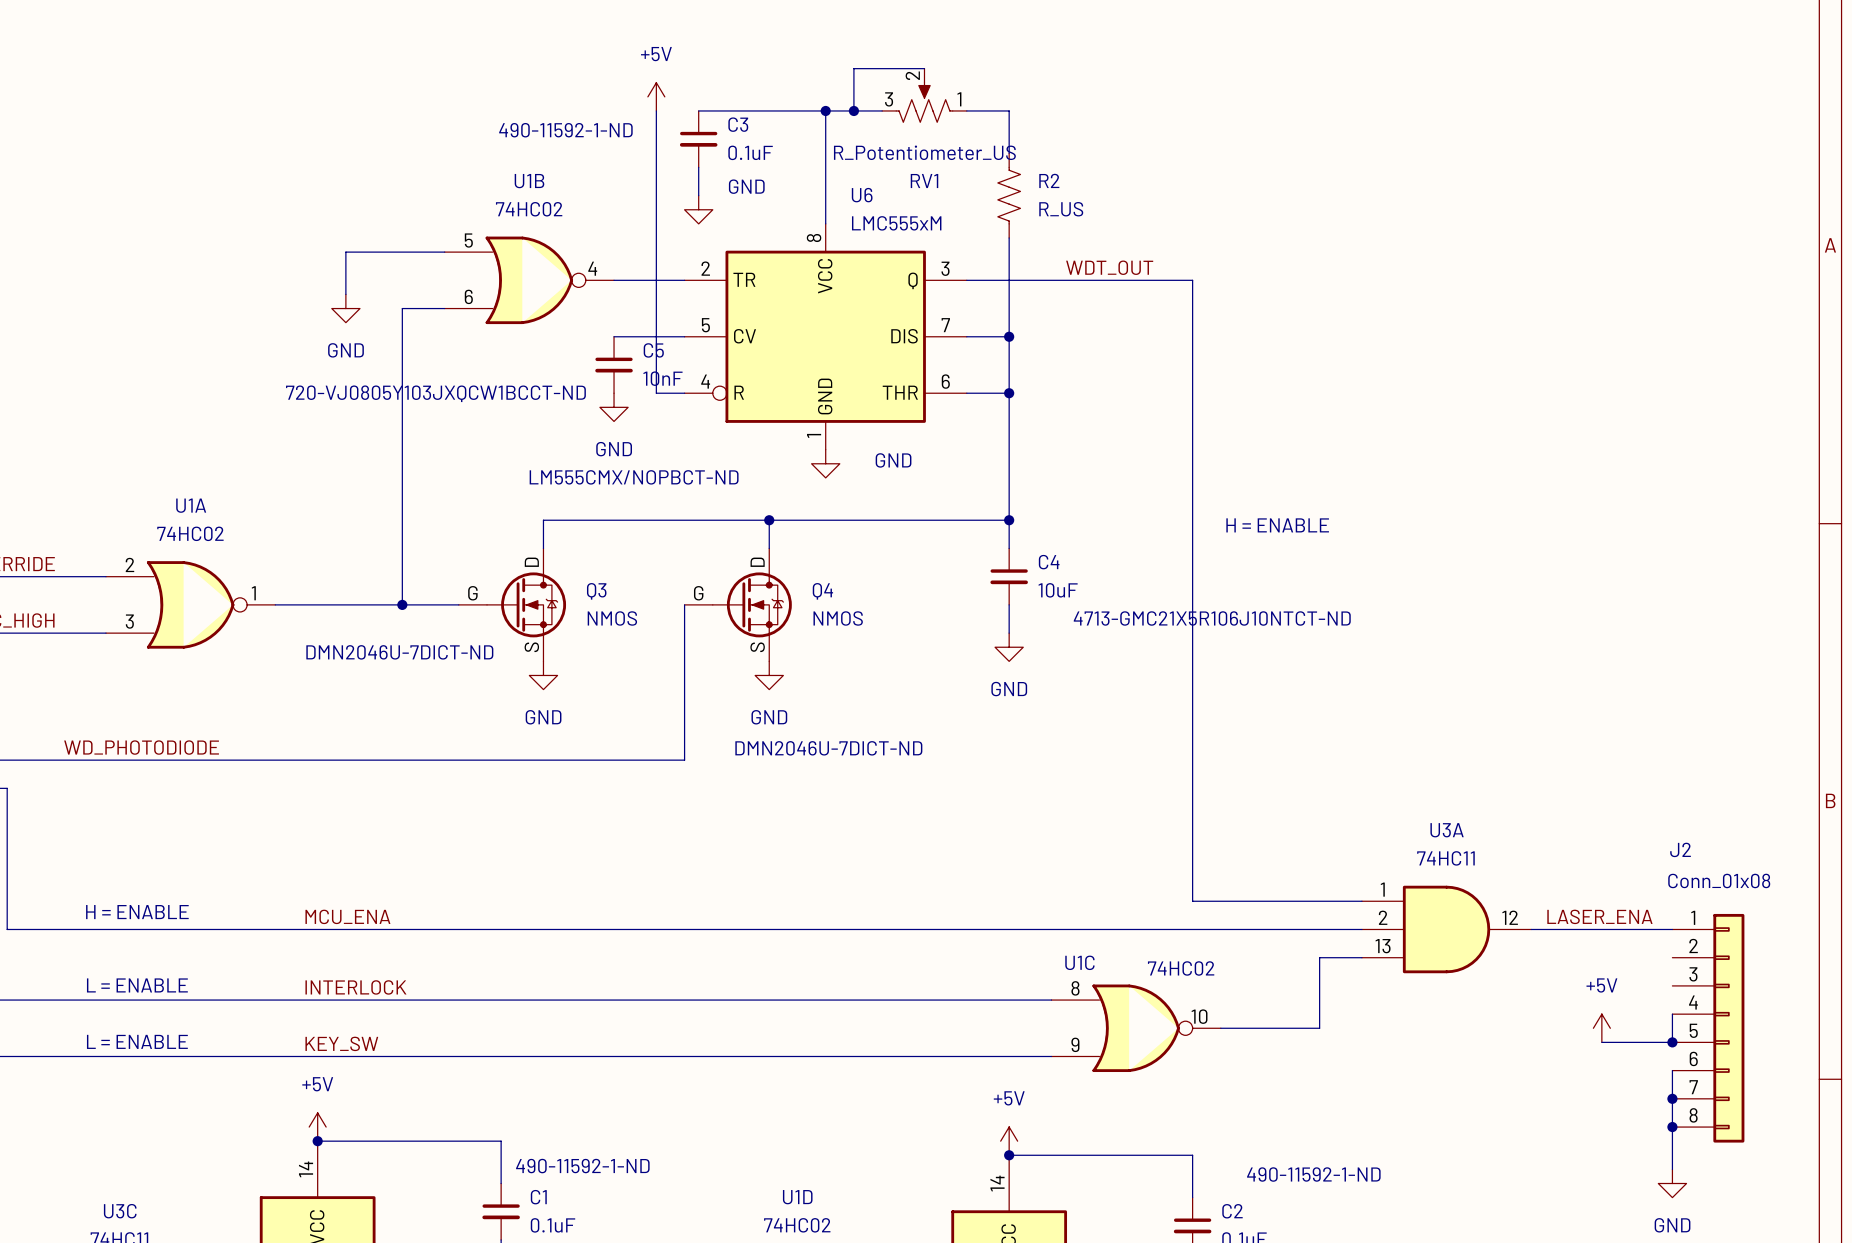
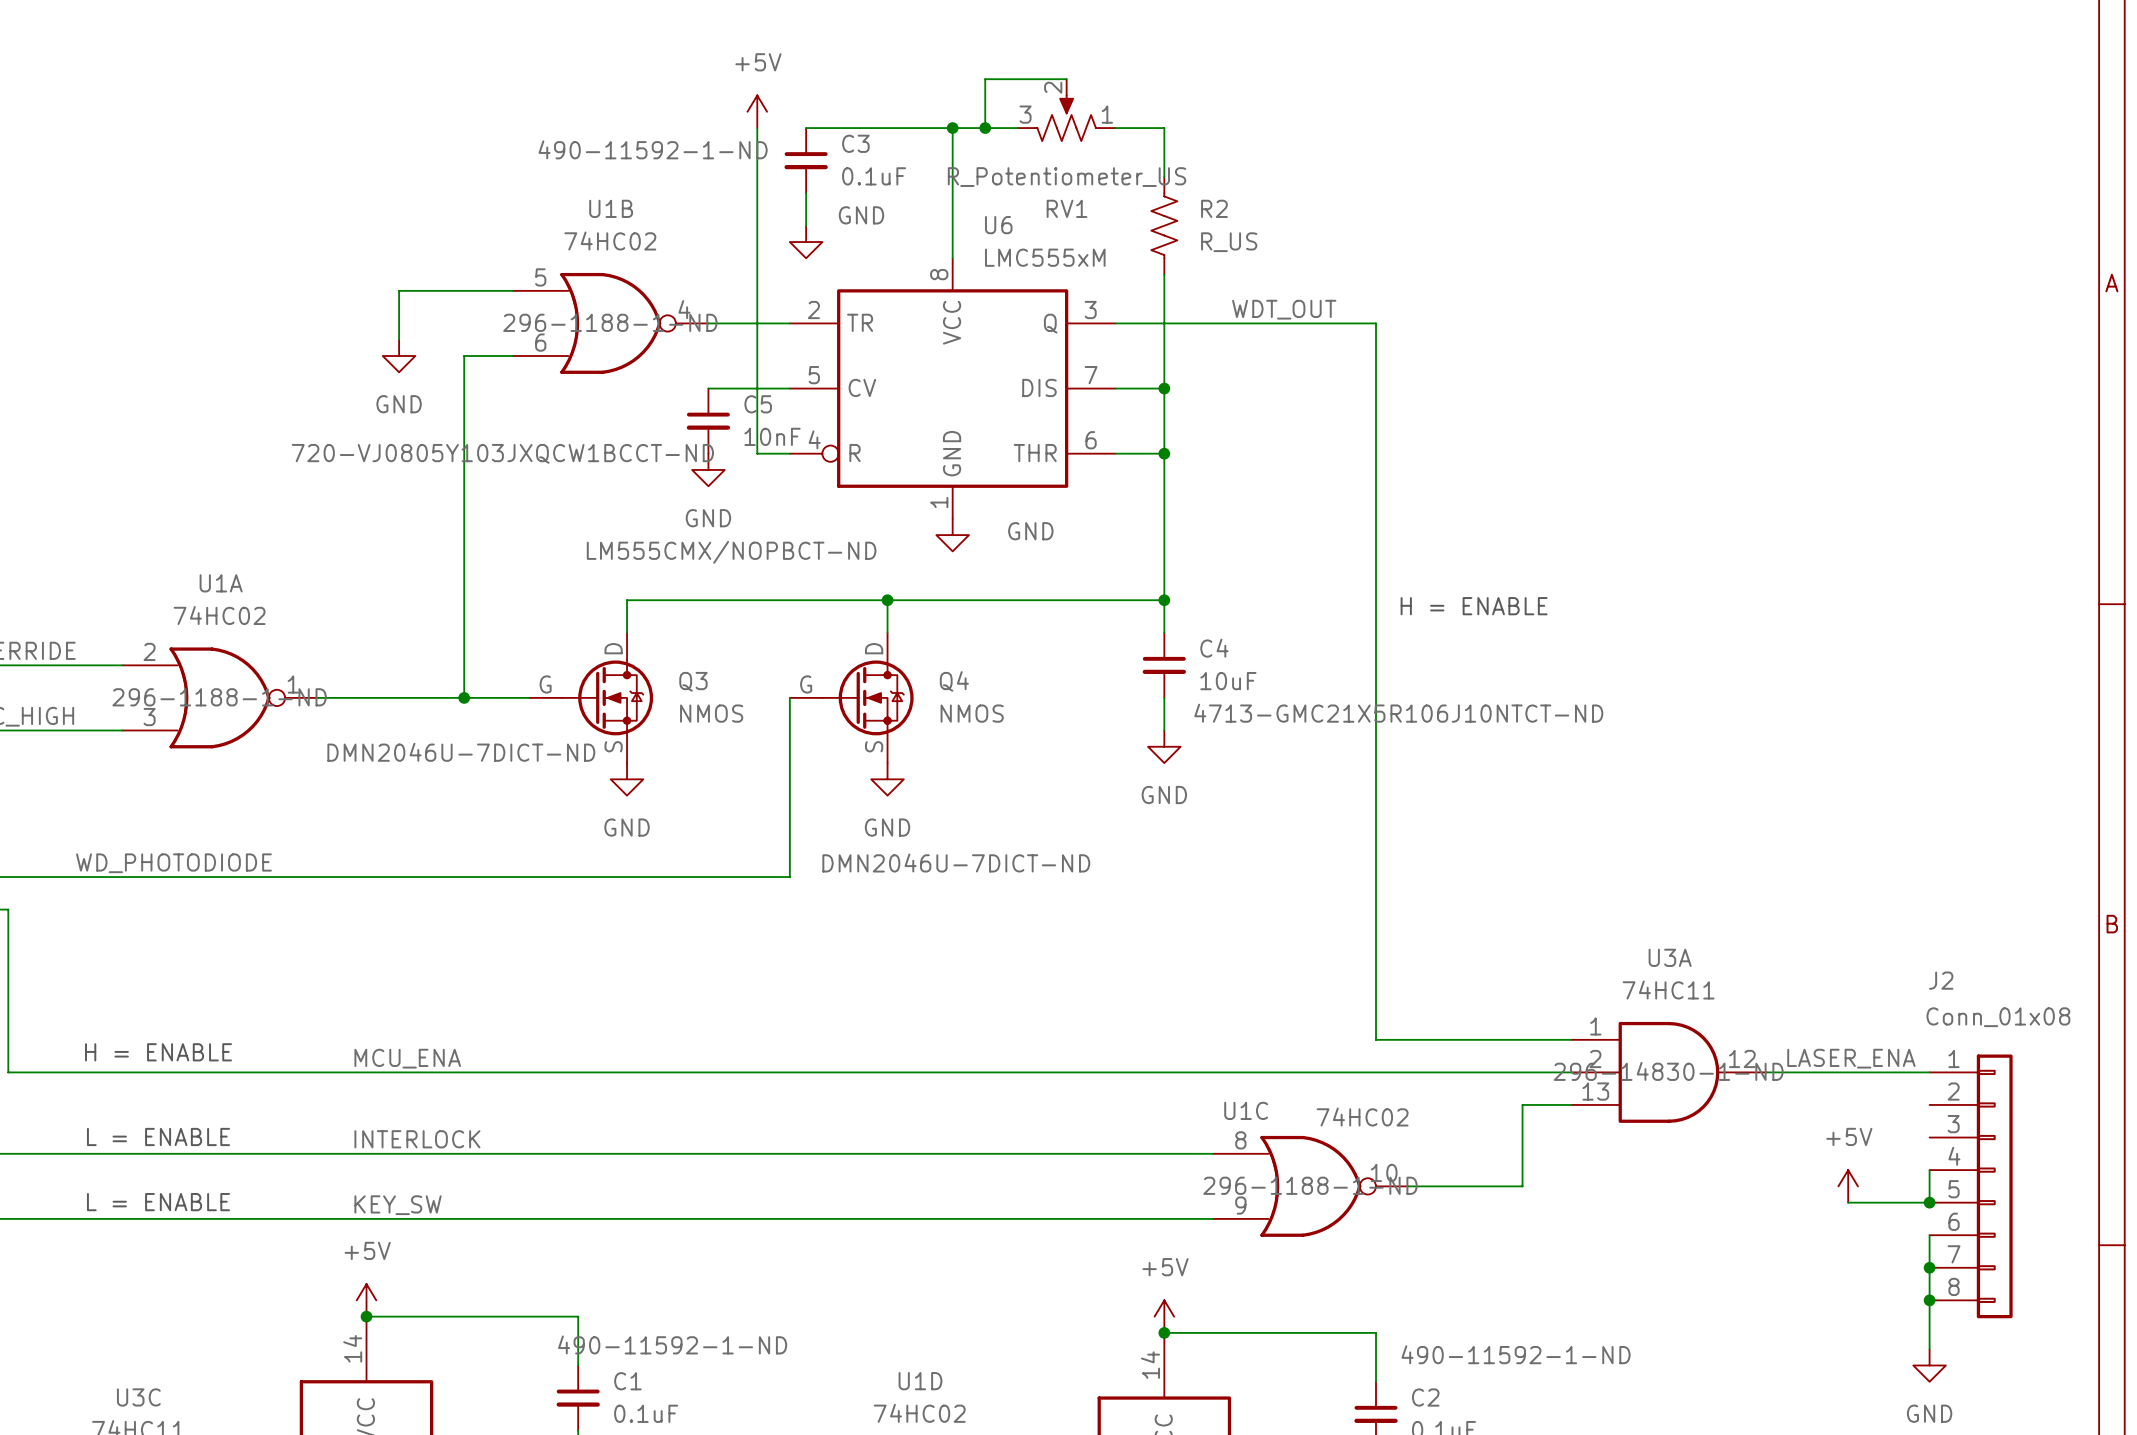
U1B text: none -> 296-1188-1-ND (610, 322)
U1A text: none -> 296-1188-1-ND (219, 697)
U3A text: none -> 296-14830-1-ND (1668, 1071)
U1C text: none -> 296-1188-1-ND (1310, 1185)

